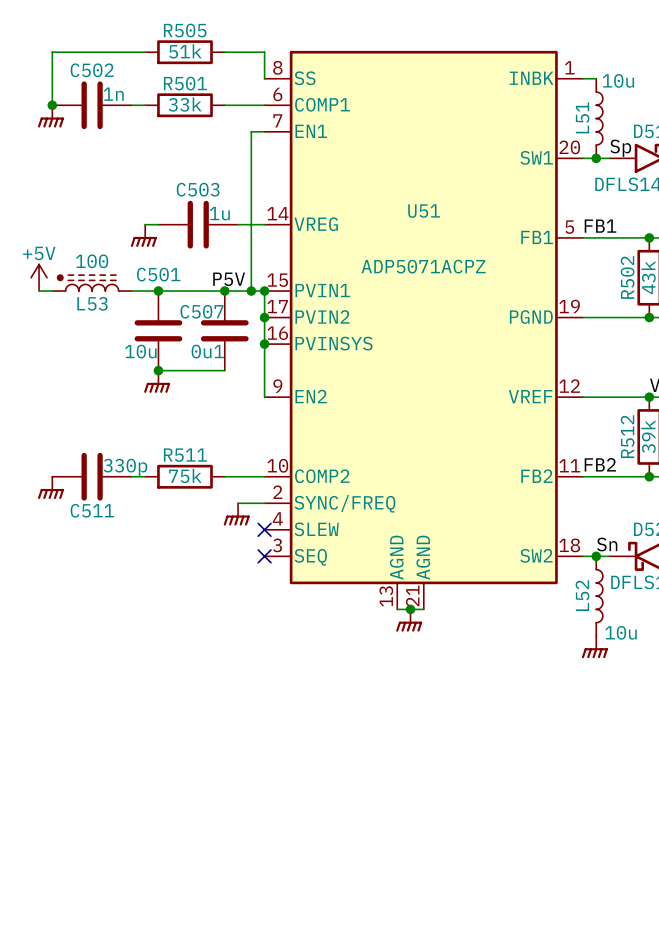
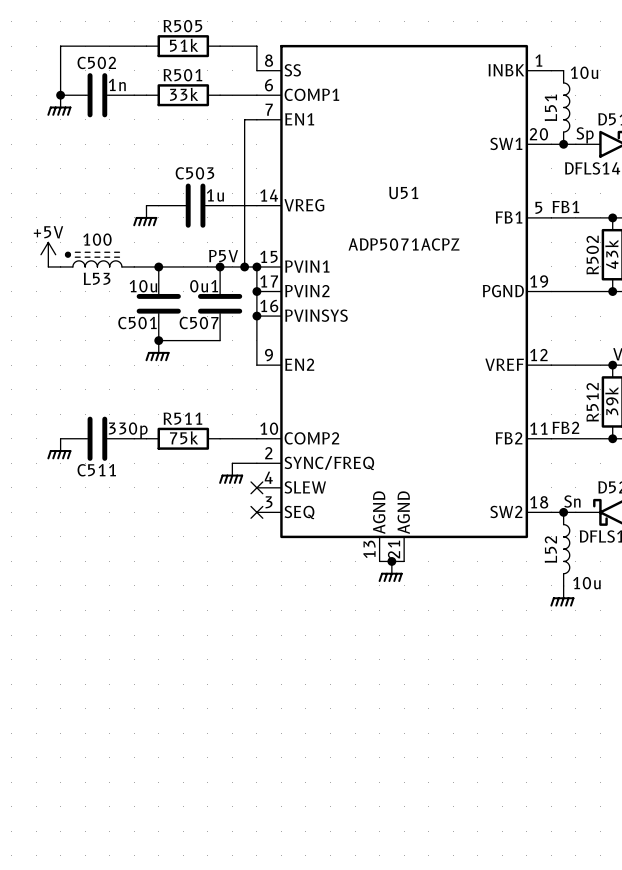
C501 name position: C501 (158, 274) -> C501 (137, 323)
C507 name position: C507 (201, 311) -> C507 (199, 323)
C501 value position: 10u (140, 351) -> 10u (143, 286)
C507 value position: 0u1 (207, 351) -> 0u1 (204, 286)

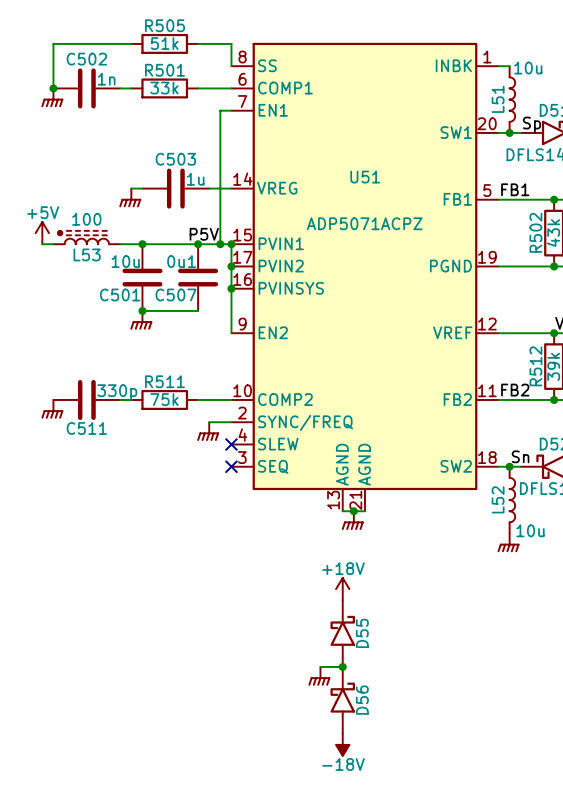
power symbol: none -> +18V (342, 589)
D55: none -> (342, 633)
wire: none -> (320, 667) (342, 667)
junction: none -> (342, 667)
power symbol: none -> (319, 676)
D56: none -> (342, 700)
power symbol: none -> -18V (342, 744)

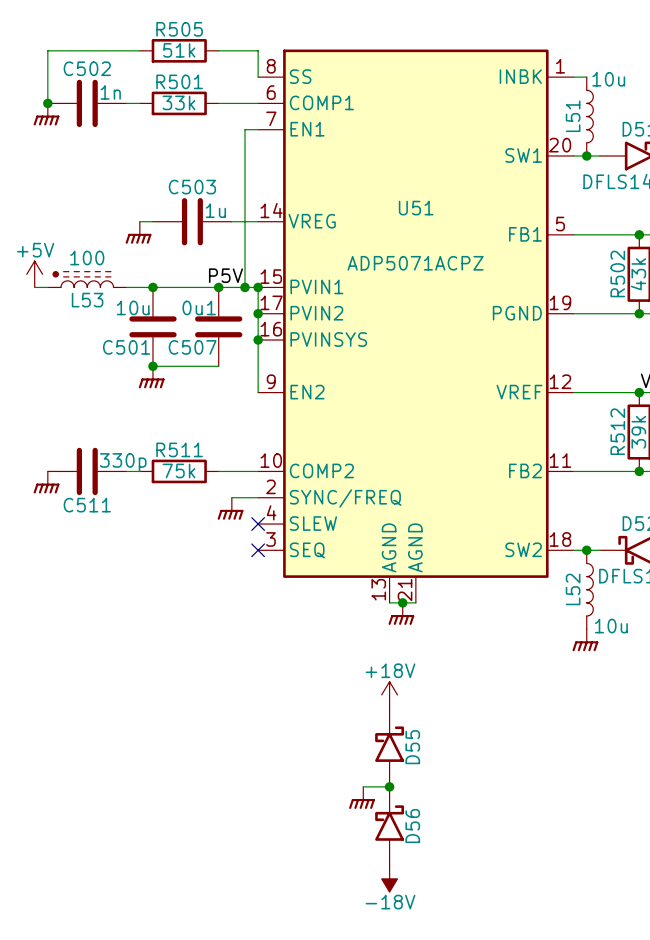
label: Sp (531, 124) -> none
label: FB1 (515, 189) -> none
label: FB2 (515, 390) -> none
label: Sn (520, 456) -> none

